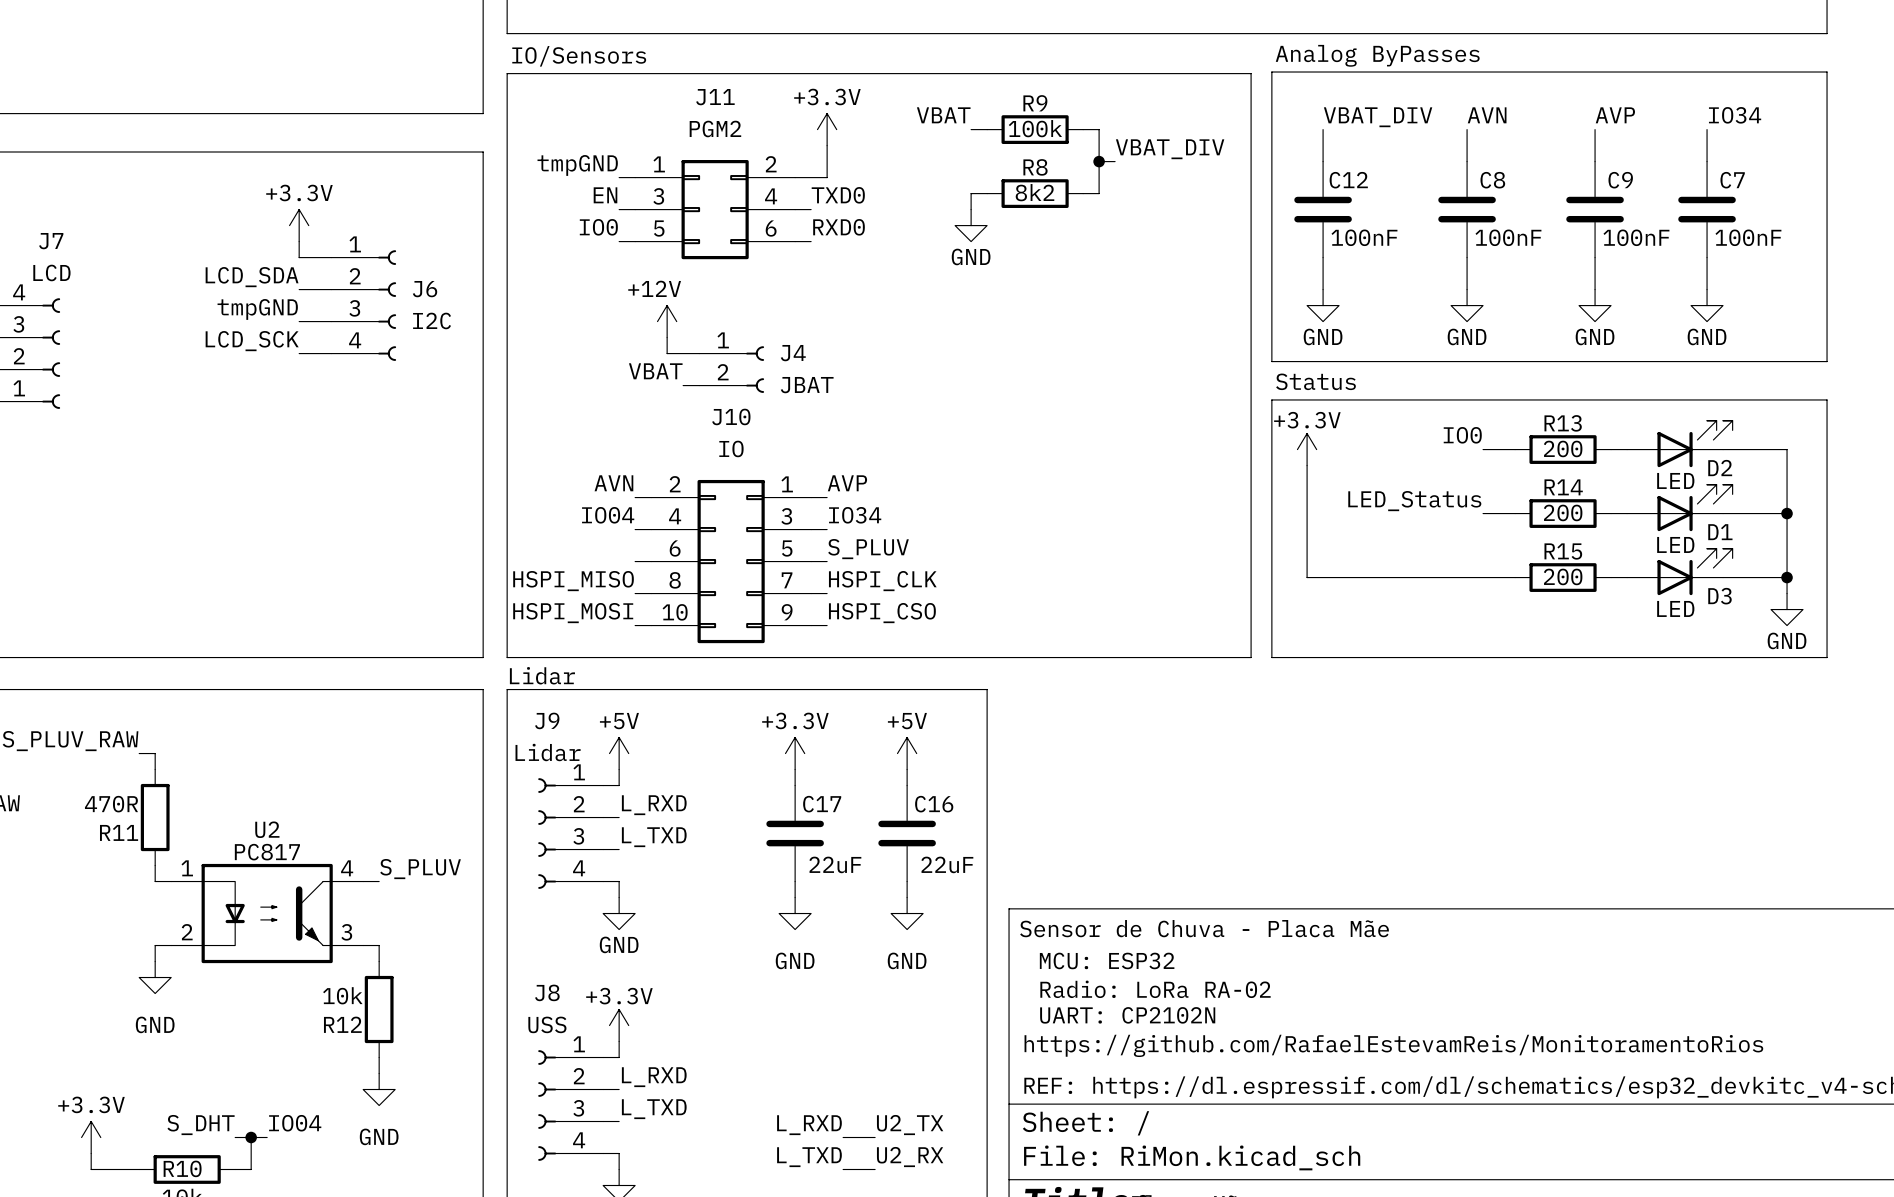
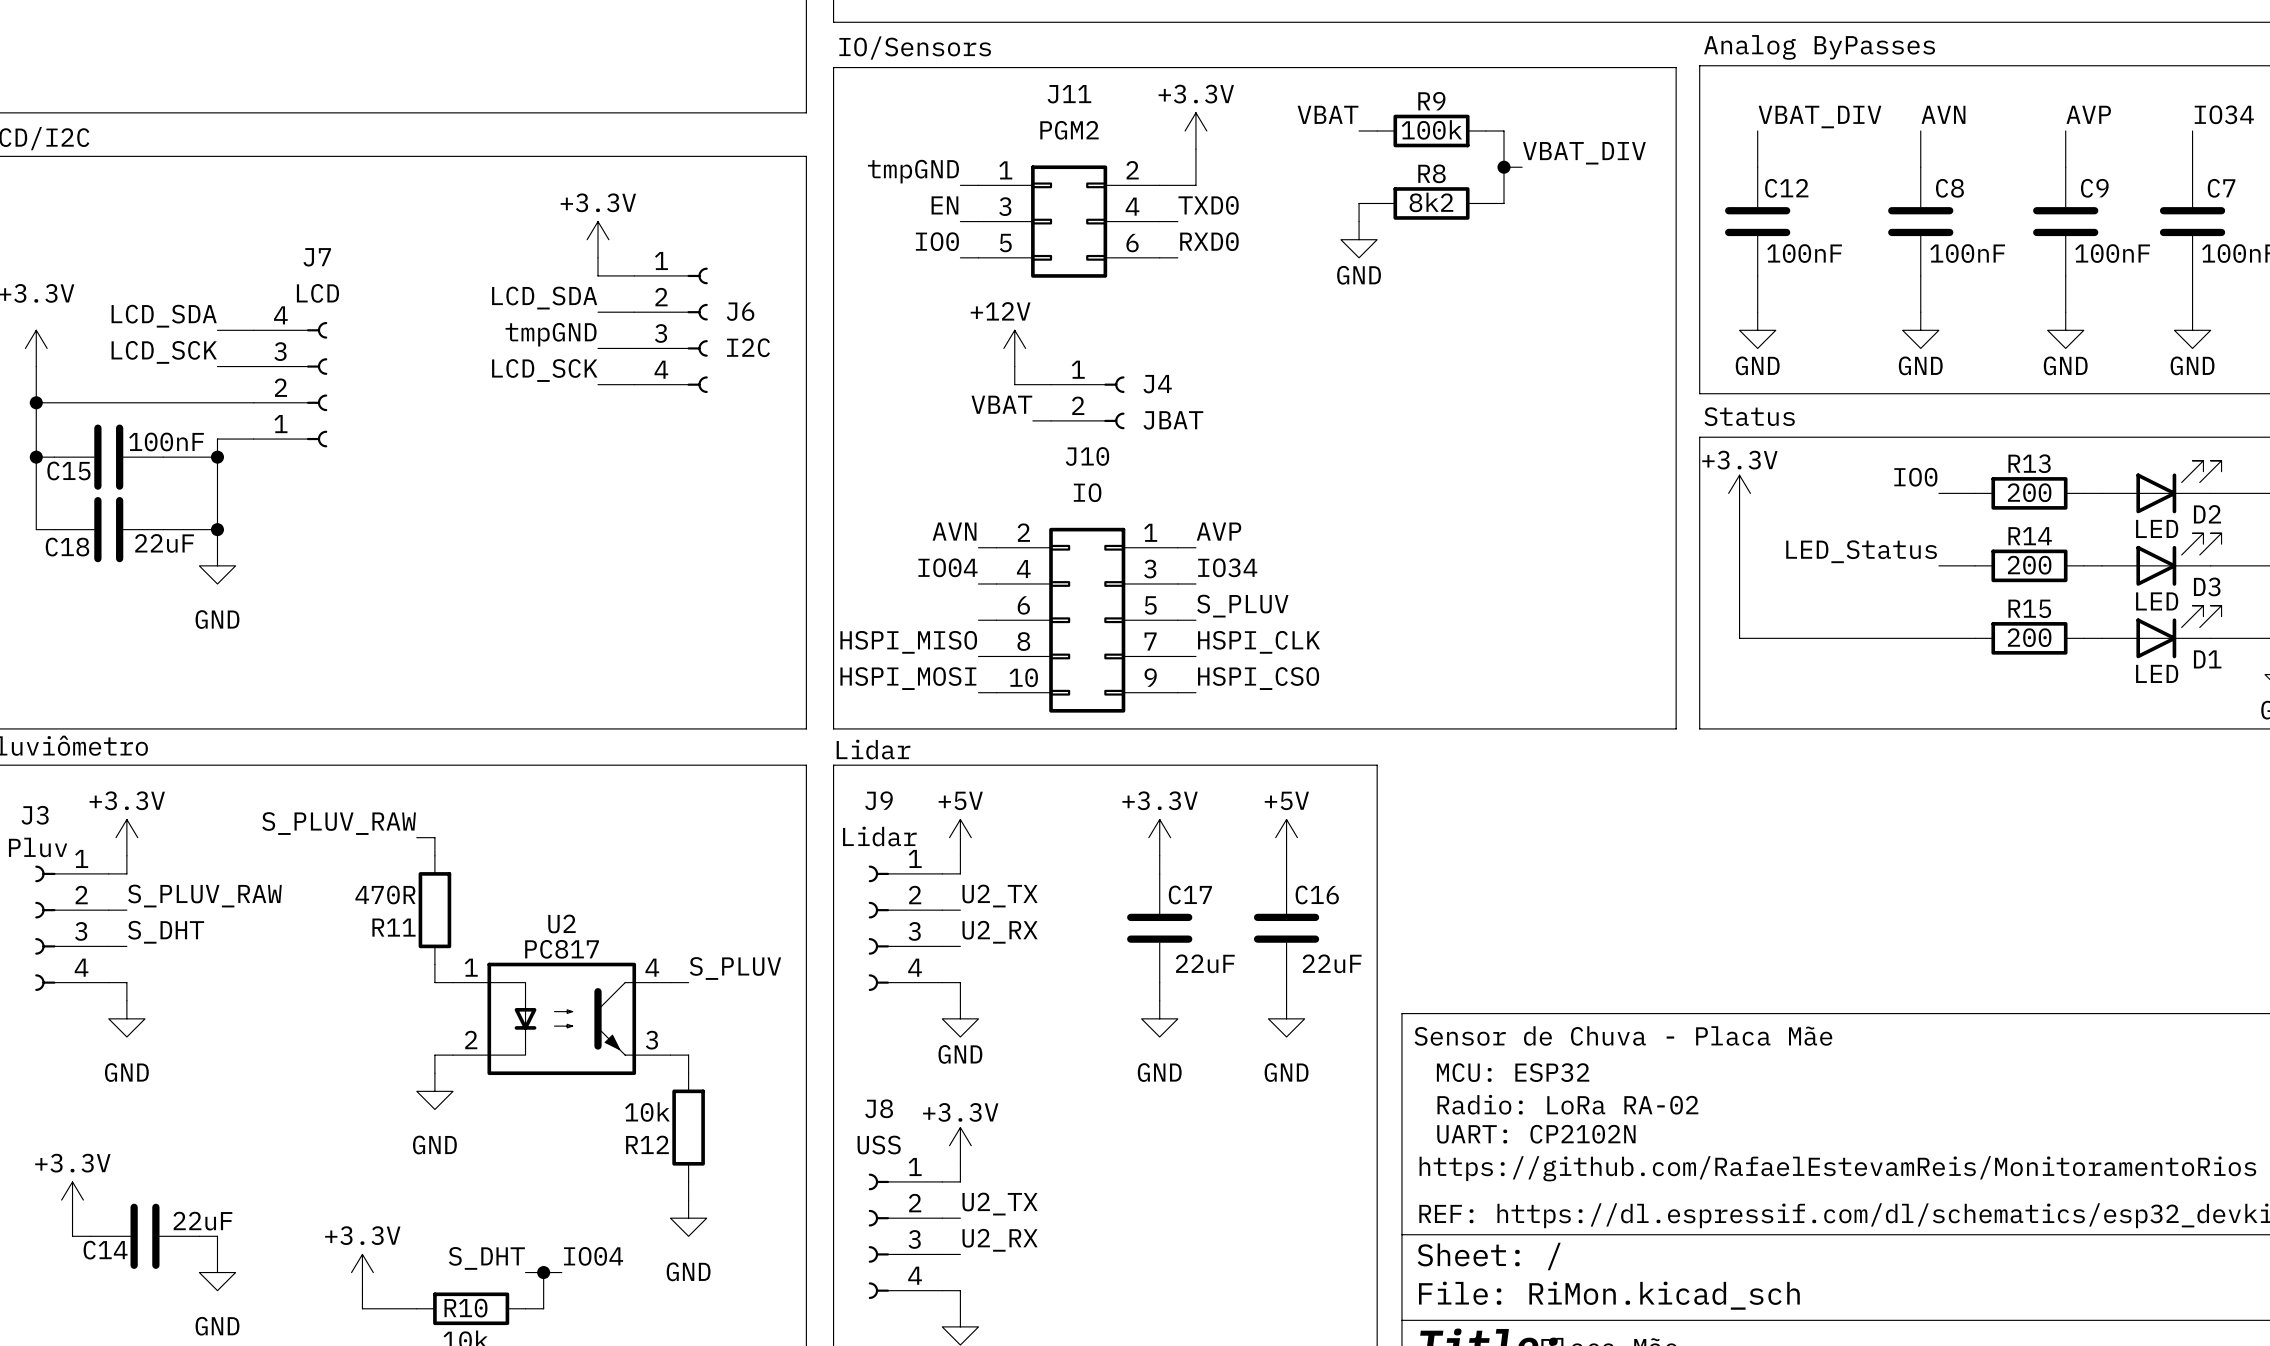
D1 name: D1 (1720, 532) -> D3 (2207, 586)
D3 name: D3 (1719, 596) -> D1 (2207, 659)
label: L_RXD (654, 805) -> U2_TX (1000, 896)
label: L_TXD (654, 837) -> U2_RX (1000, 932)
label: L_RXD (654, 1077) -> U2_TX (1000, 1204)
label: L_TXD (654, 1109) -> U2_RX (1000, 1240)
label: L_RXD (809, 1125) -> none
label: U2_TX (910, 1125) -> none
wire: (843, 1137) (875, 1137) -> none
label: L_TXD (809, 1157) -> none
label: U2_RX (910, 1157) -> none
wire: (843, 1169) (875, 1169) -> none

